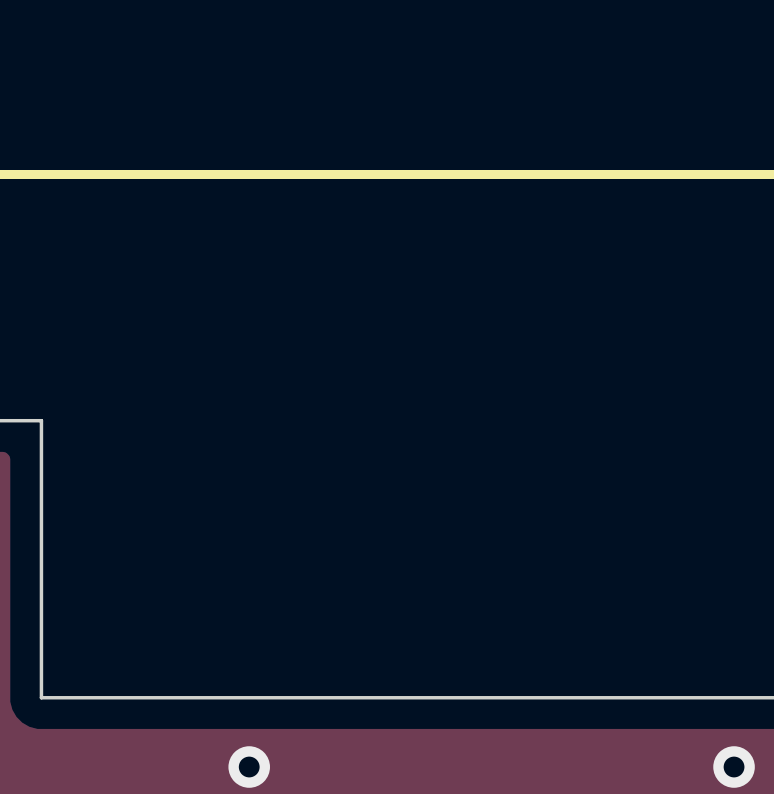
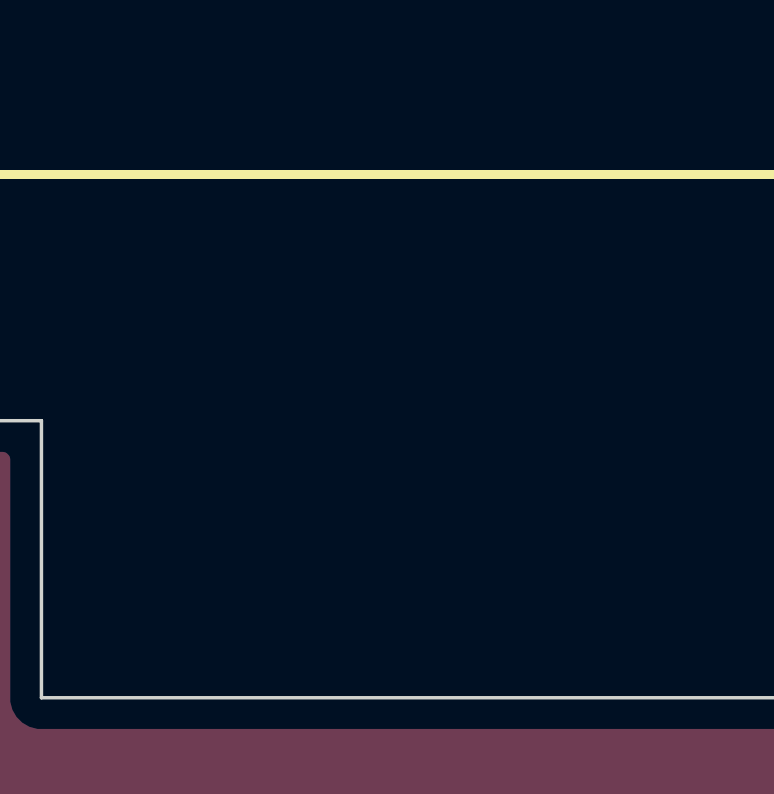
via: (249, 767) -> none
via: (734, 767) -> none

